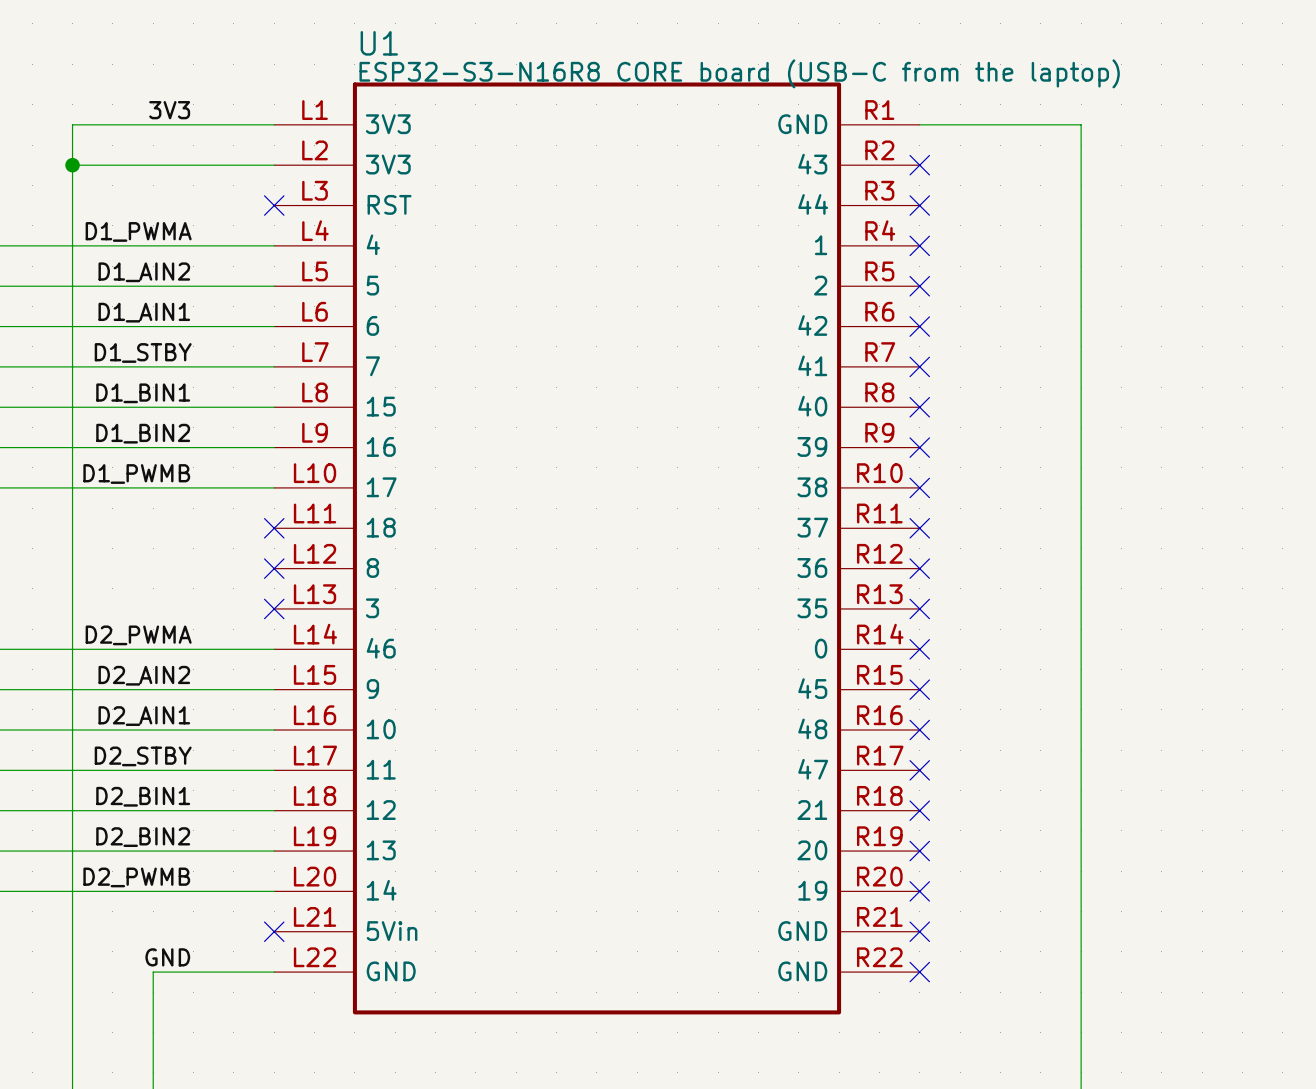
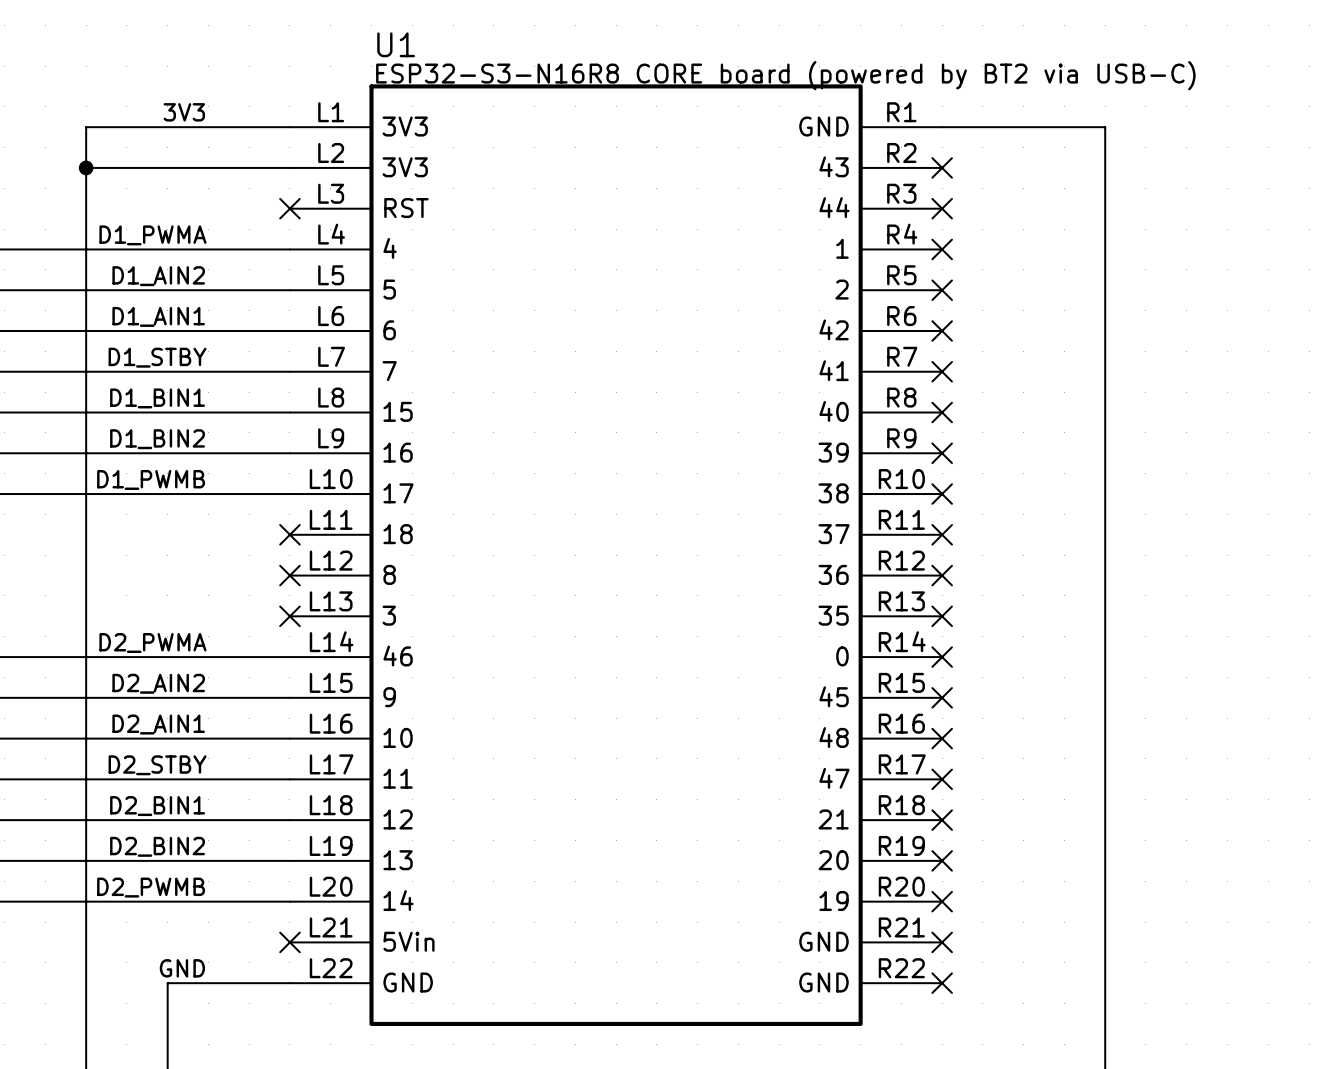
U1 value: ESP32-S3-N16R8 CORE board (USB-C from the laptop) (739, 73) -> ESP32-S3-N16R8 CORE board (powered by BT2 via USB-C) (785, 75)

